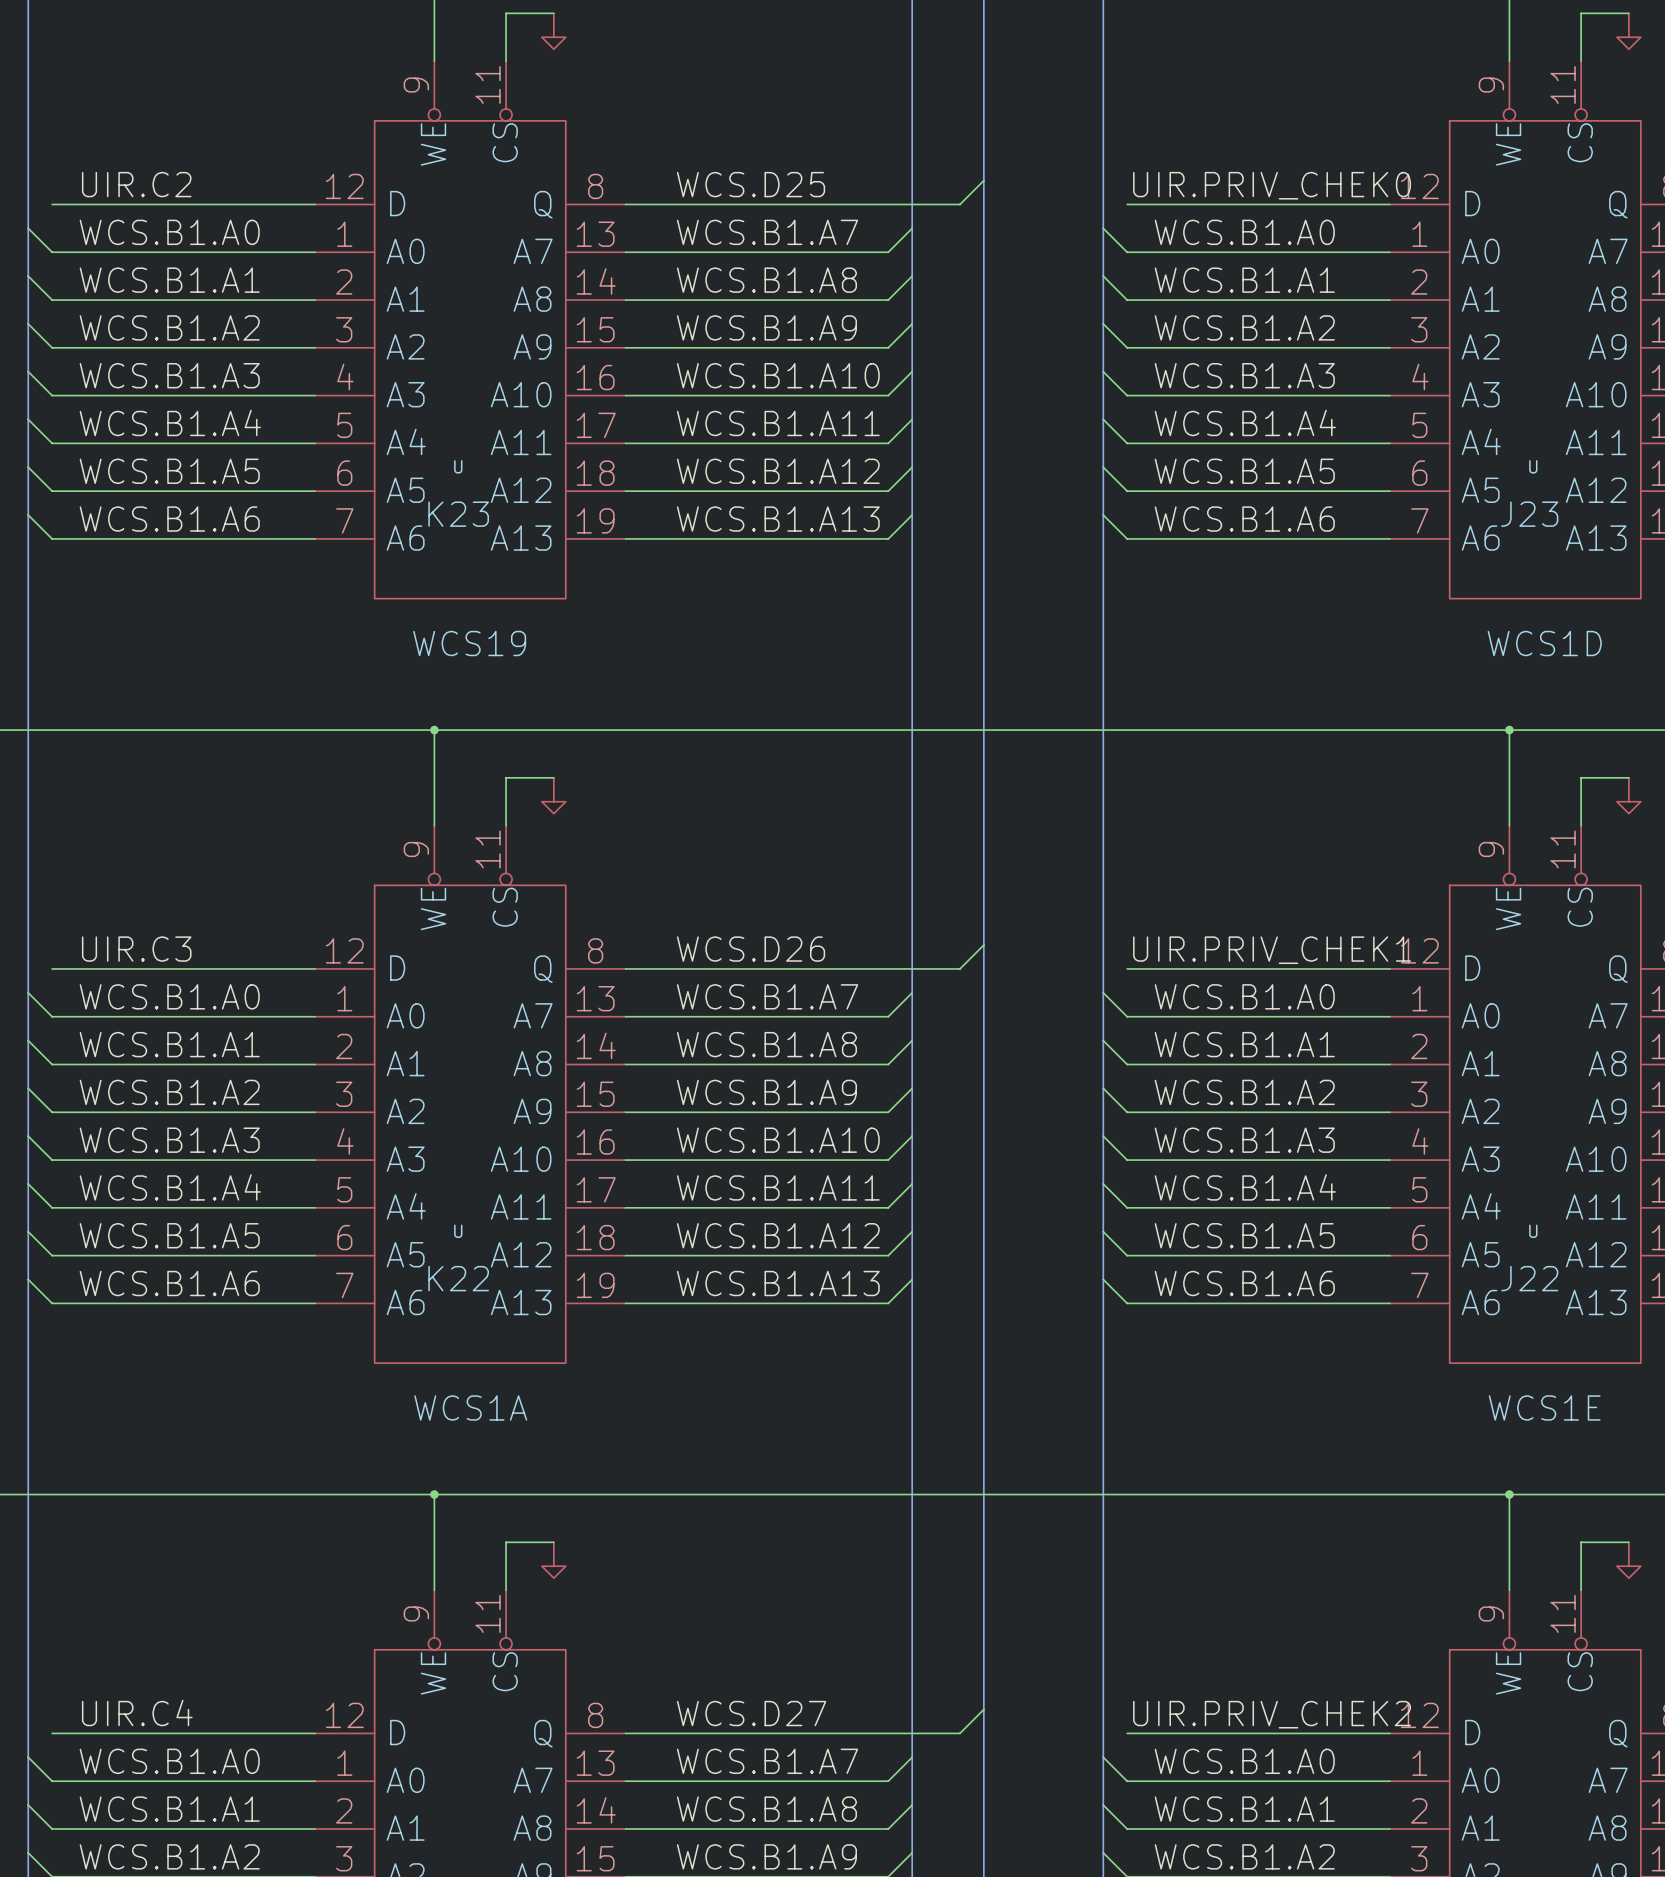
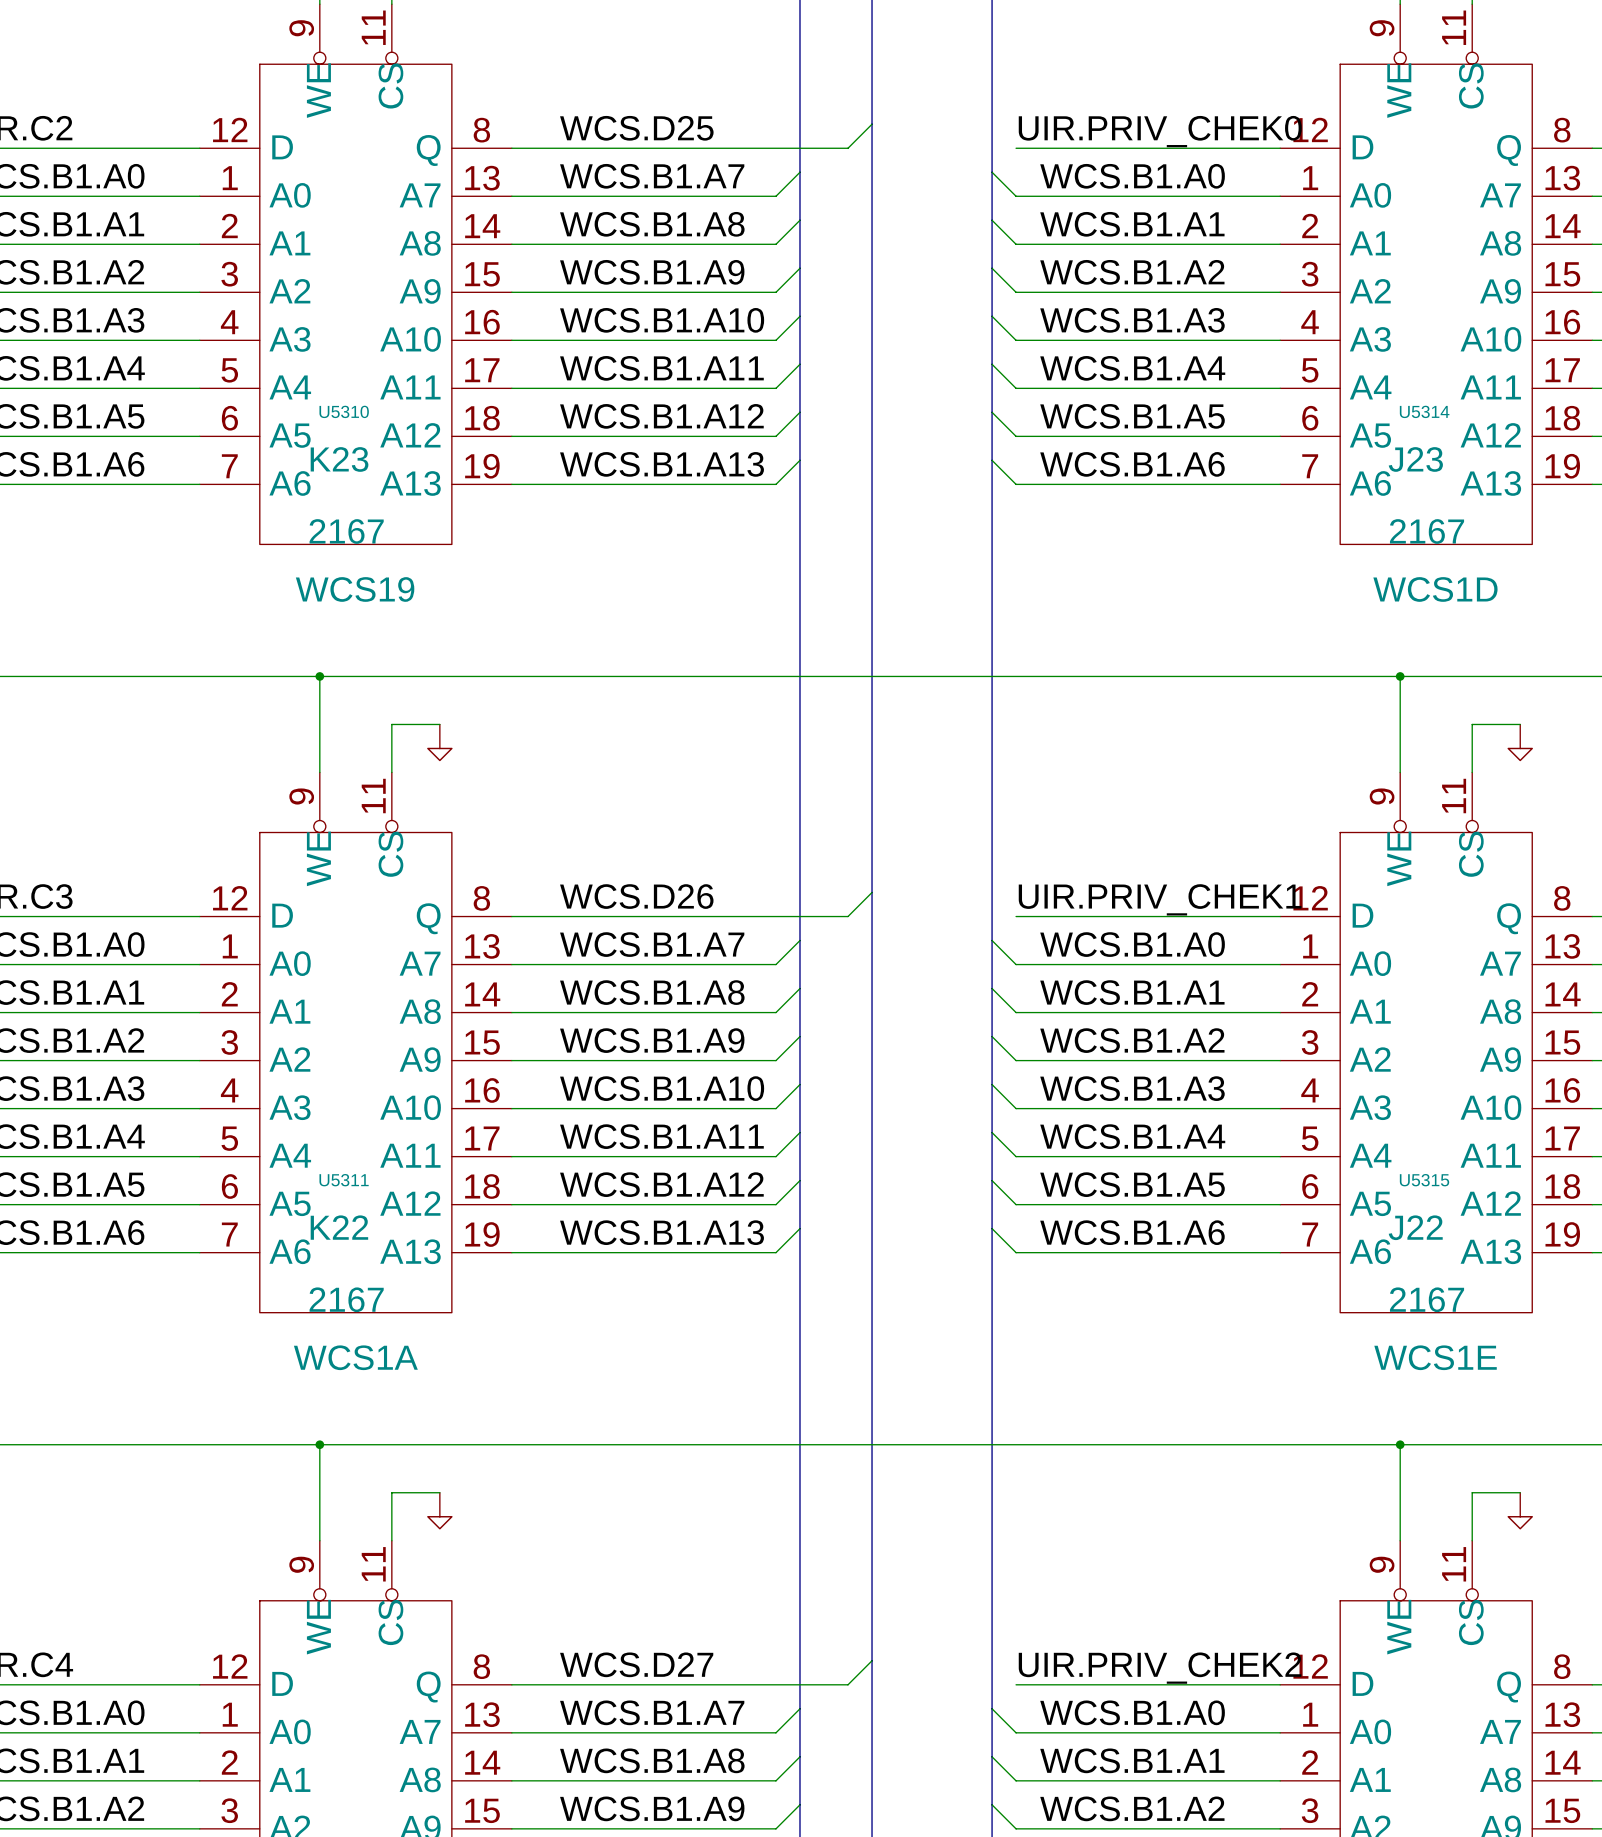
U name: U (458, 466) -> U5310 (344, 411)
U name: U (1533, 466) -> U5314 (1424, 411)
U value: none -> 2167 (346, 531)
U value: none -> 2167 (1427, 531)
U name: U (458, 1231) -> U5311 (344, 1180)
U name: U (1533, 1231) -> U5315 (1424, 1180)
U value: none -> 2167 (346, 1299)
U value: none -> 2167 (1427, 1299)

